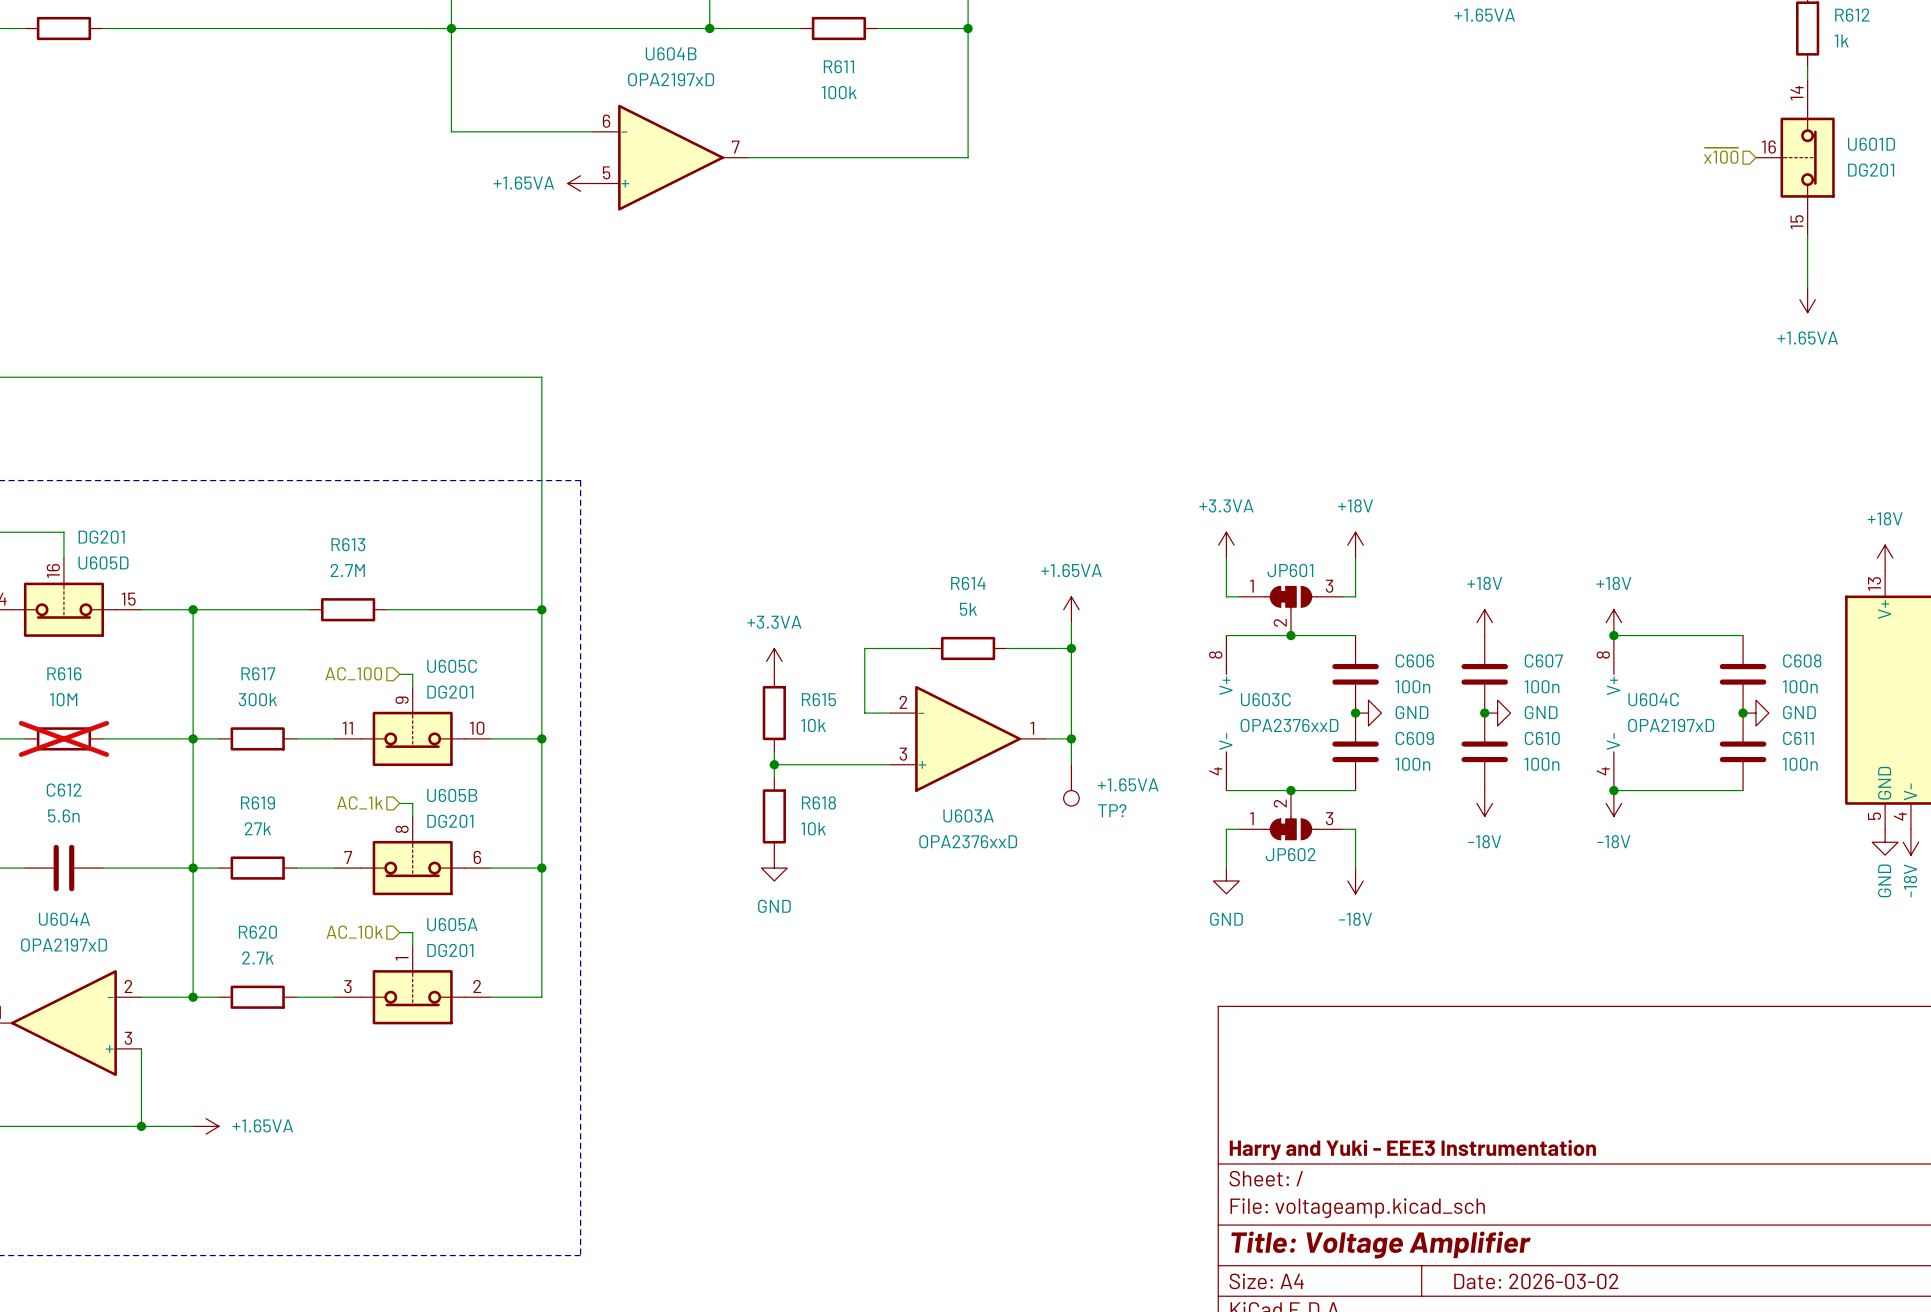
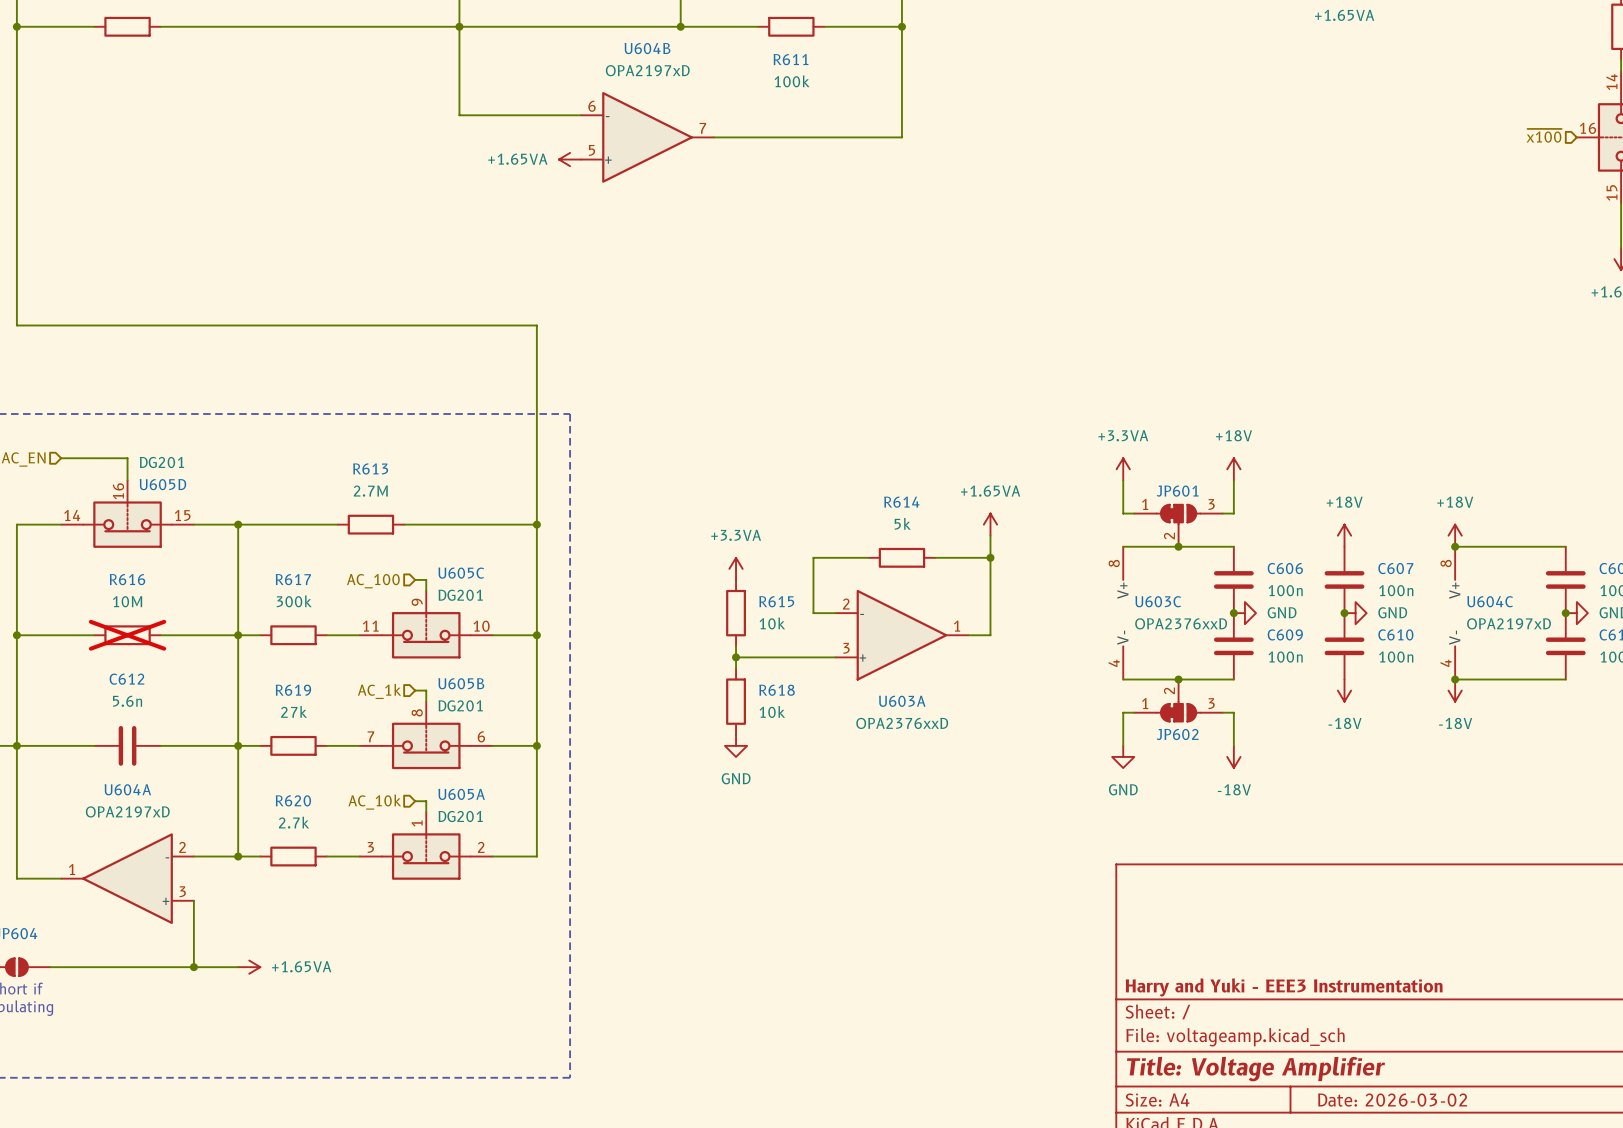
wire: (1071, 738) (1071, 764) -> none
junction: (1071, 738) -> none
TP?: +1.65VA (1071, 785) -> none

